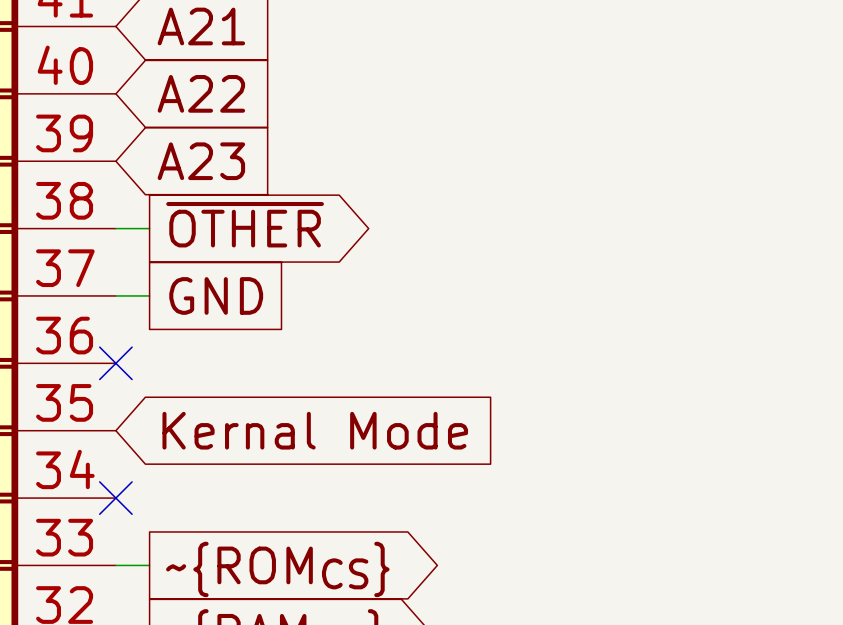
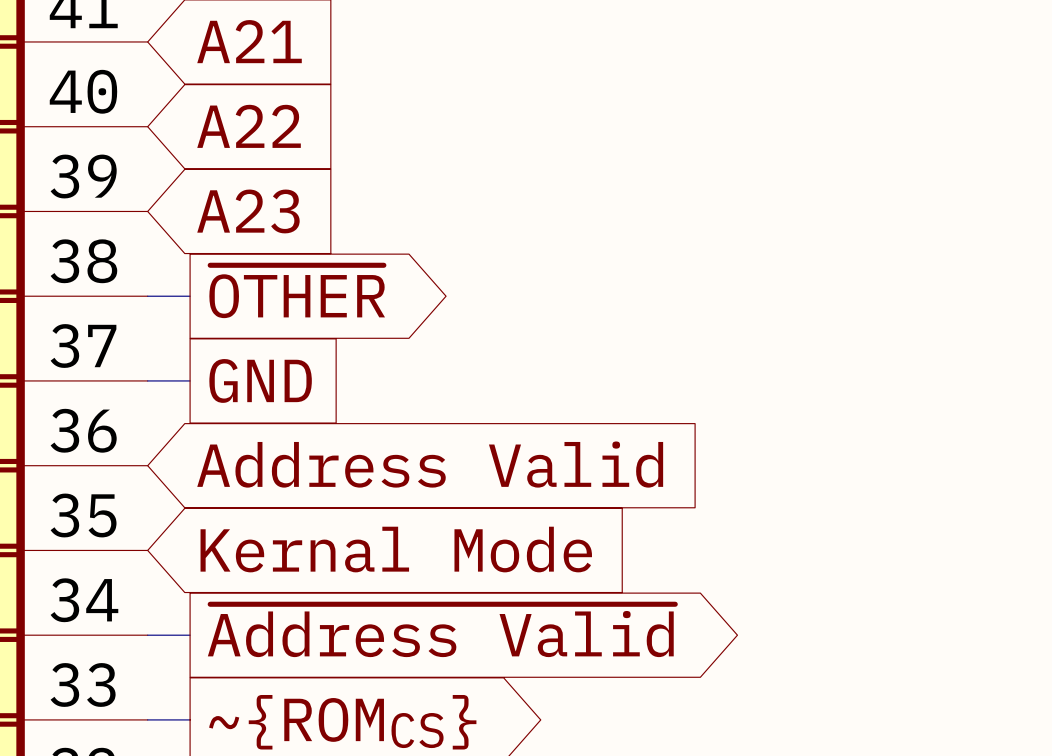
no-connect mark: (115, 363) -> none
global label: none -> Address Valid (430, 464)
global label: none -> ~{Address Valid} (441, 630)
wire: none -> (147, 635) (190, 635)
no-connect mark: (115, 498) -> none

